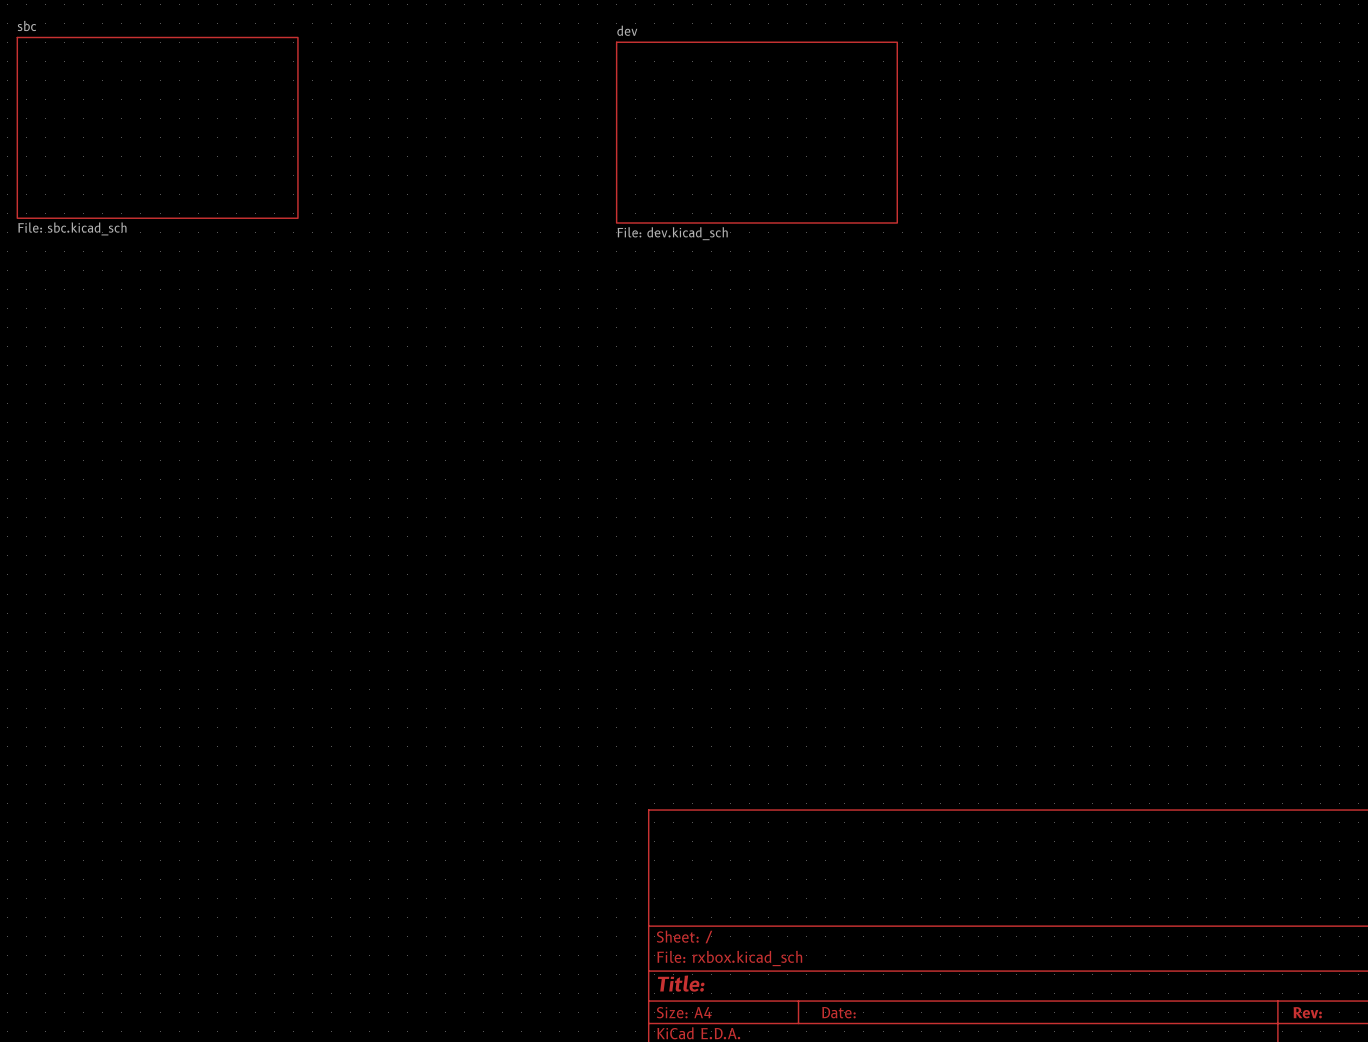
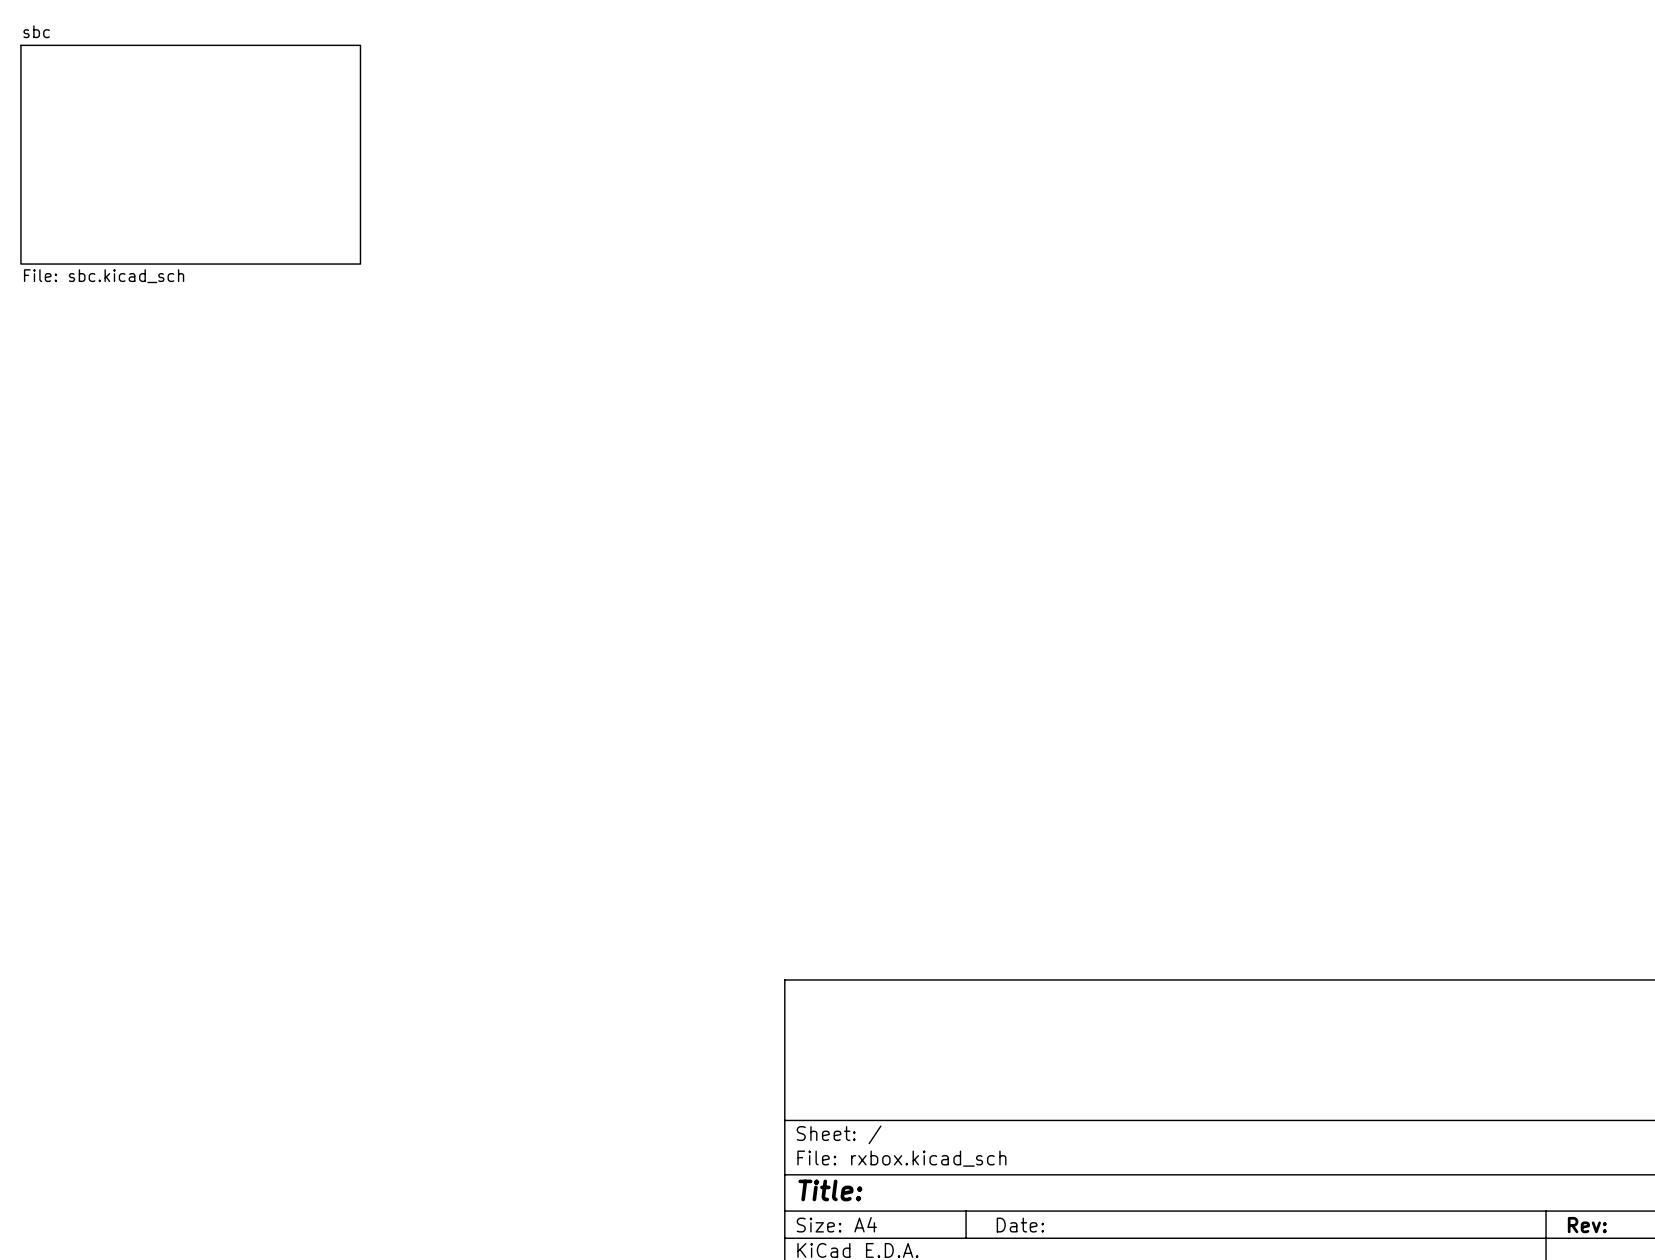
sheet dev: File: dev.kicad_sch (756, 132) -> none

